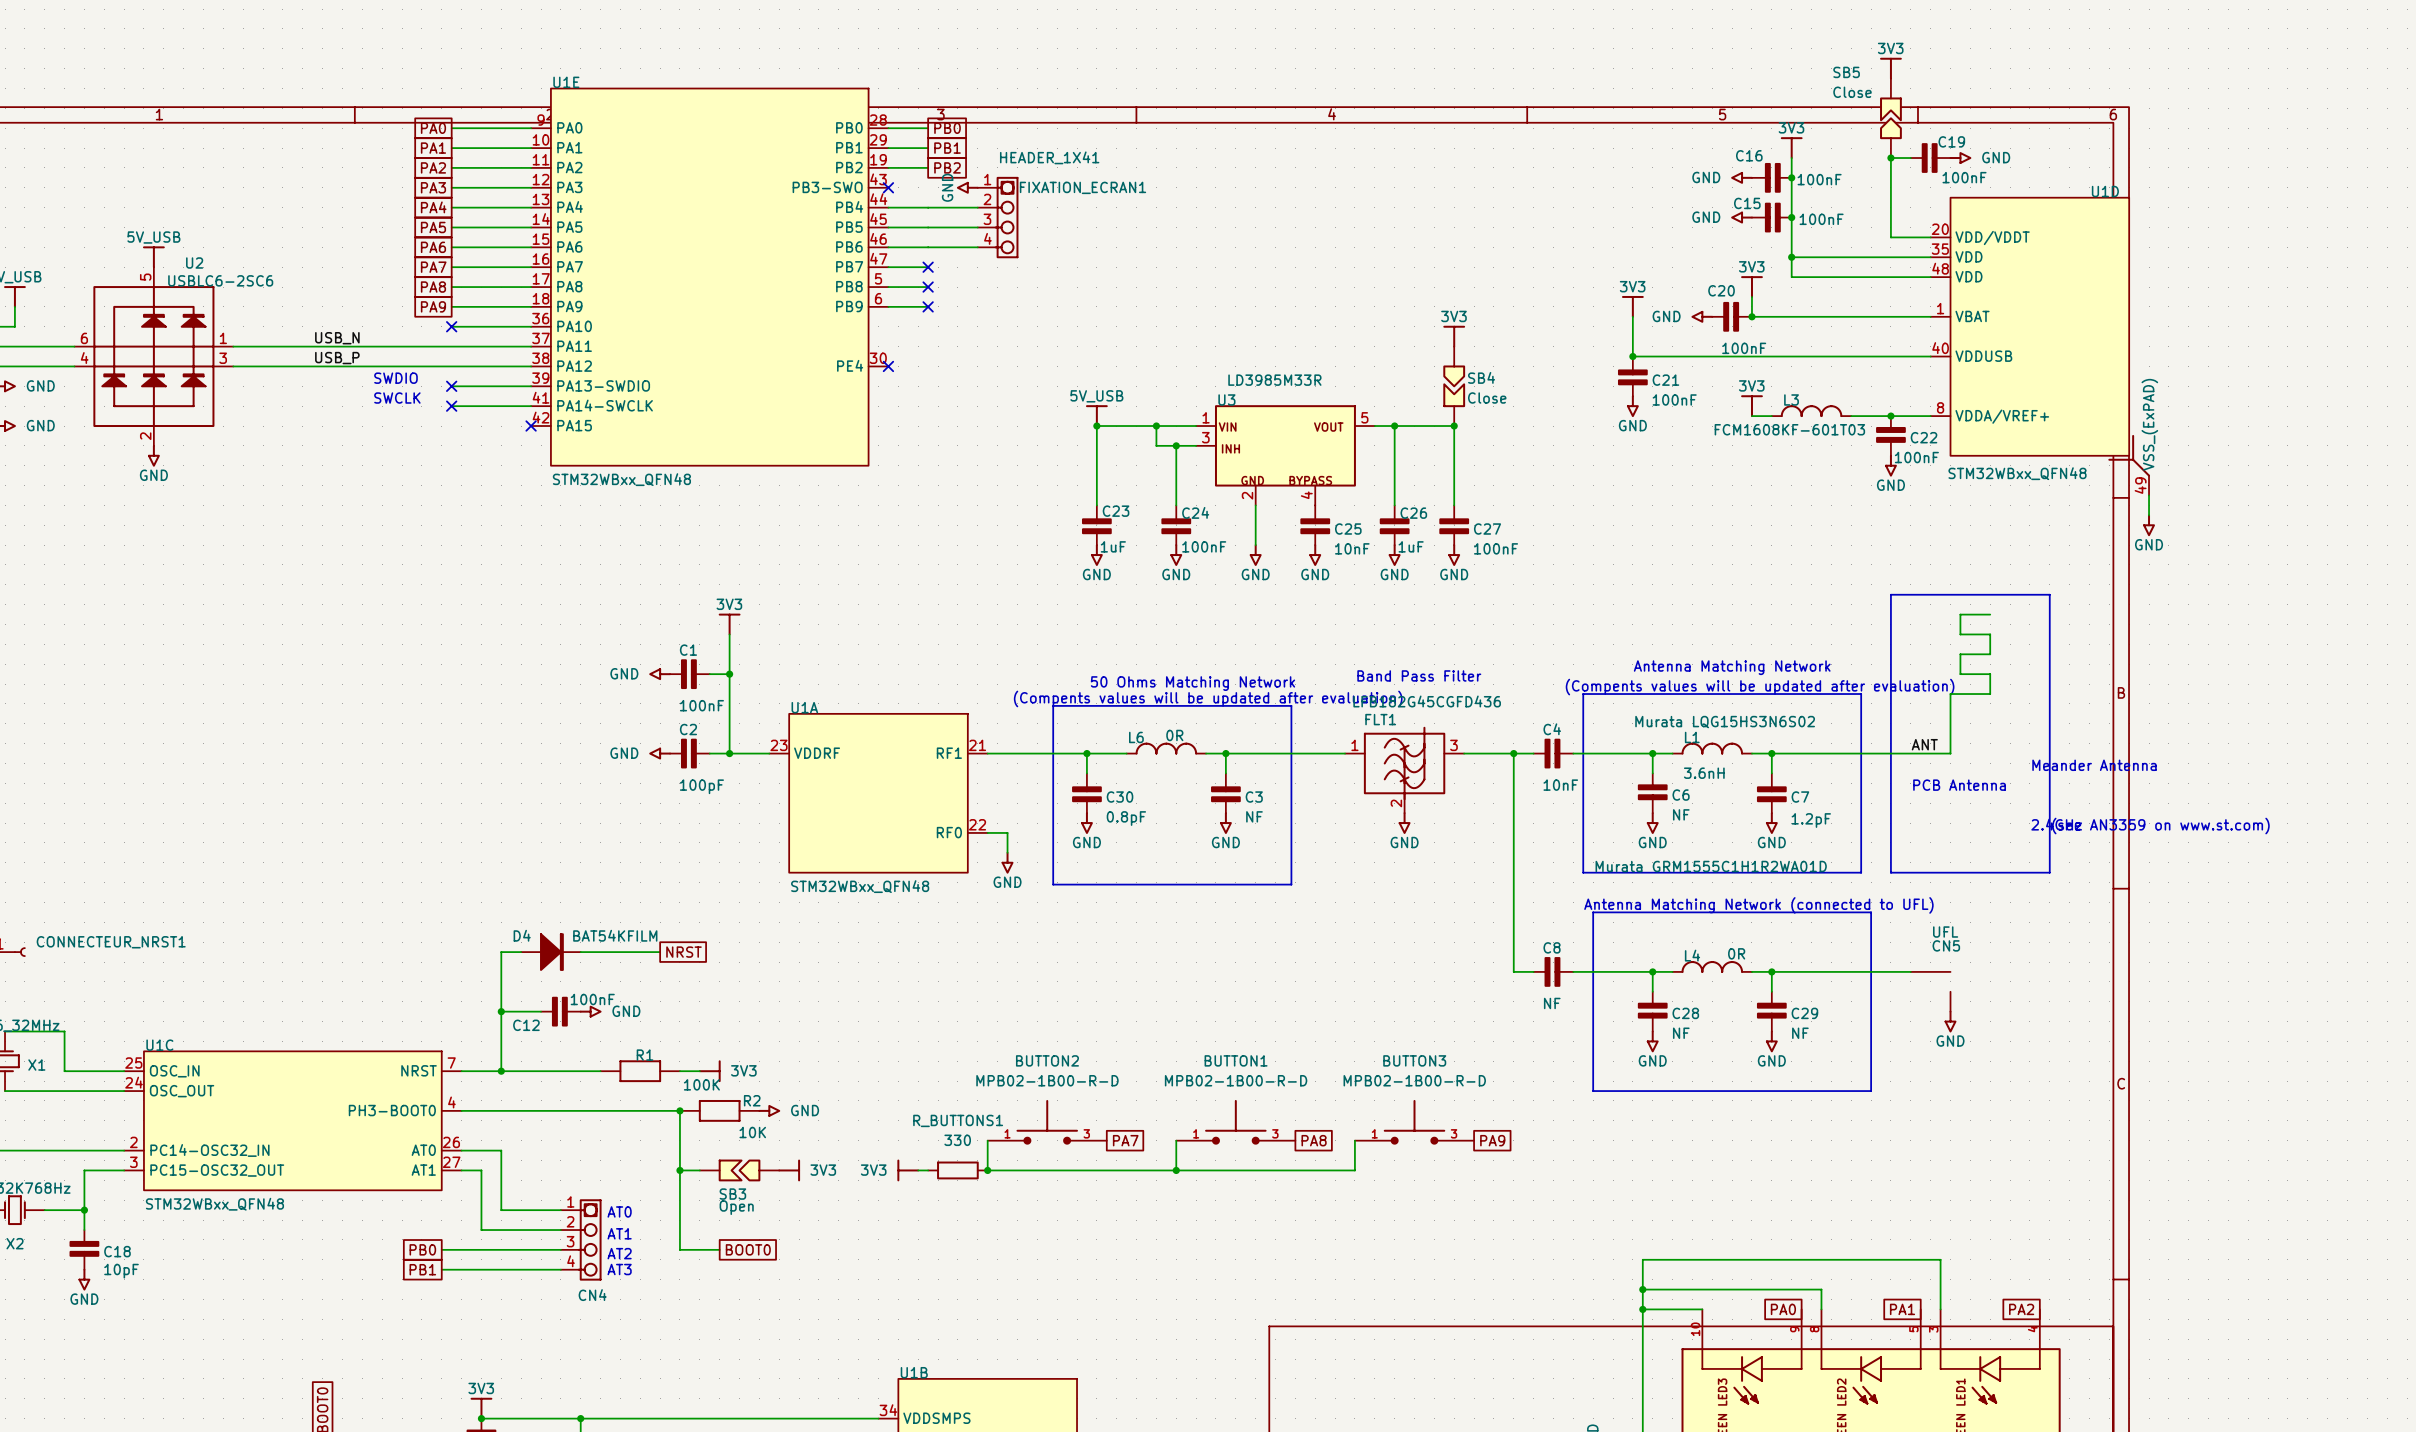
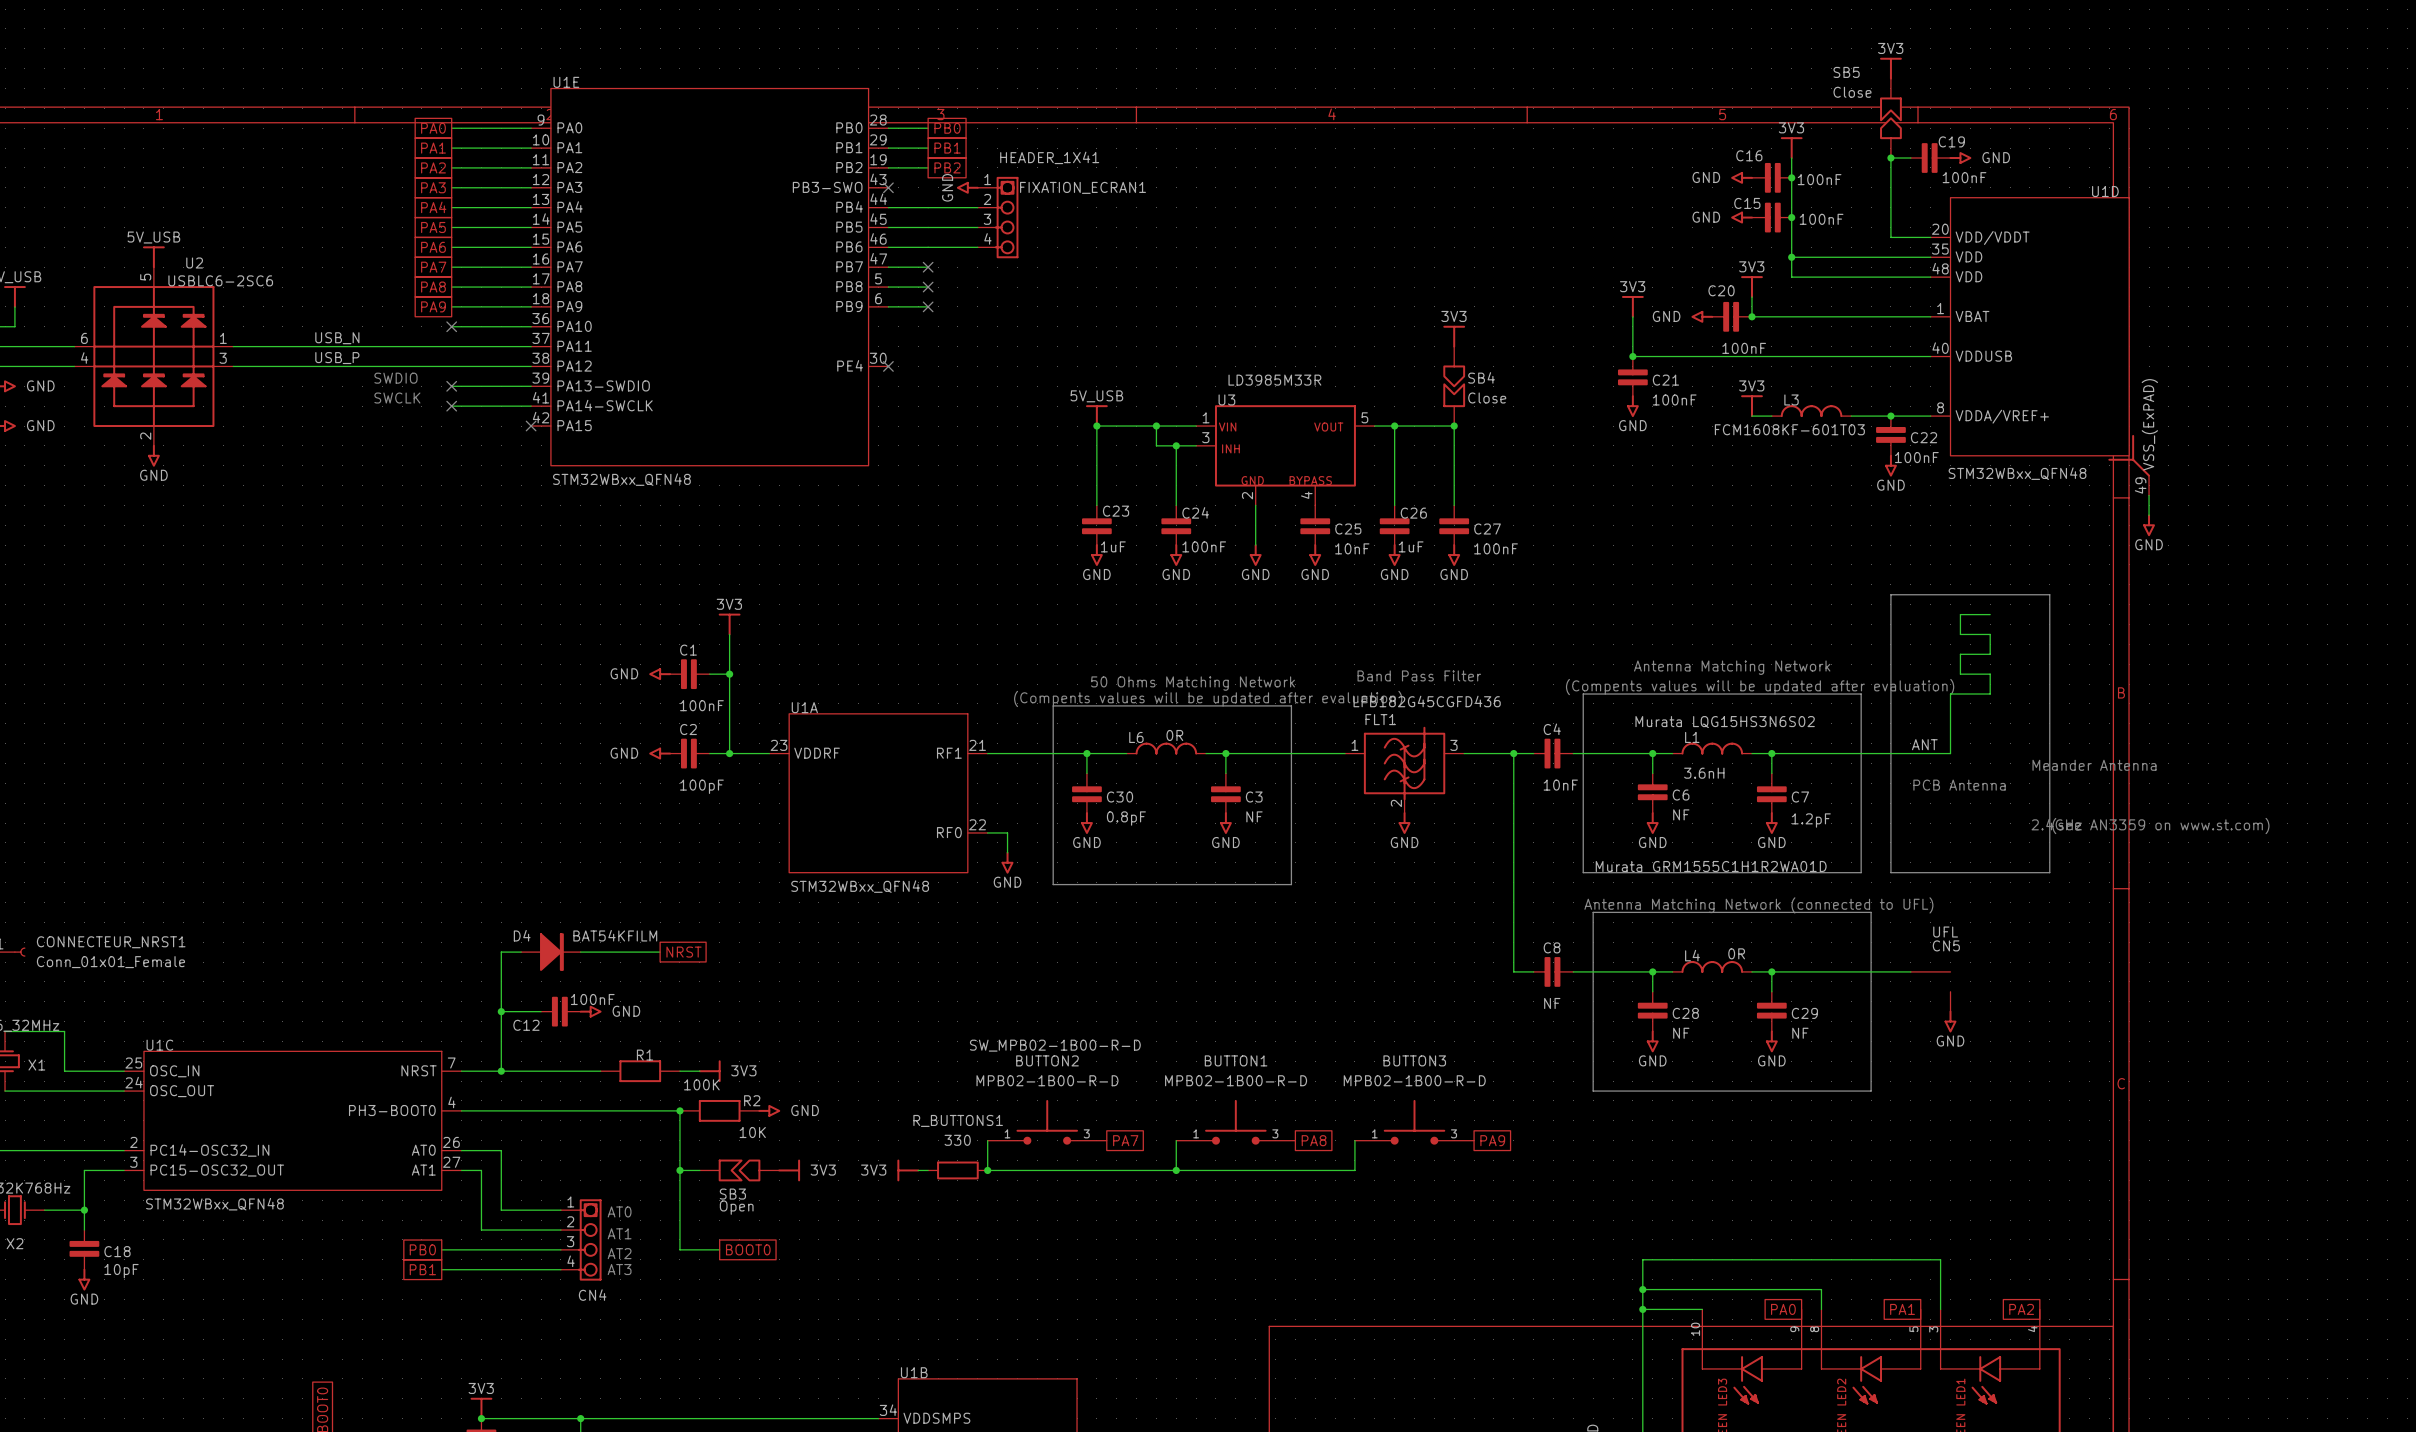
CONNECTEUR_NRST1 value: none -> Conn_01x01_Female (110, 962)
BUTTON2 text: none -> SW_MPB02-1B00-R-D (1055, 1045)

